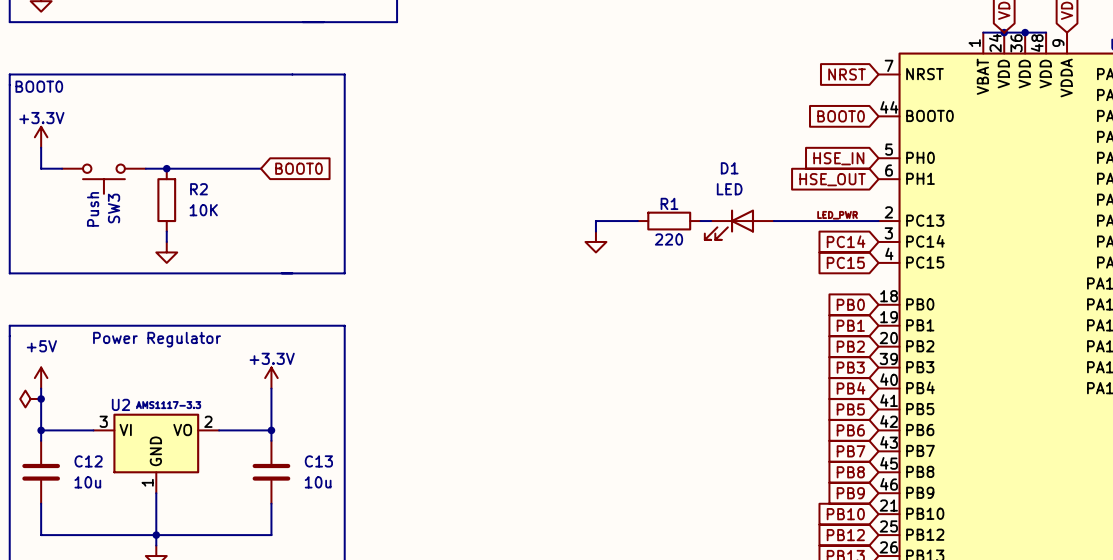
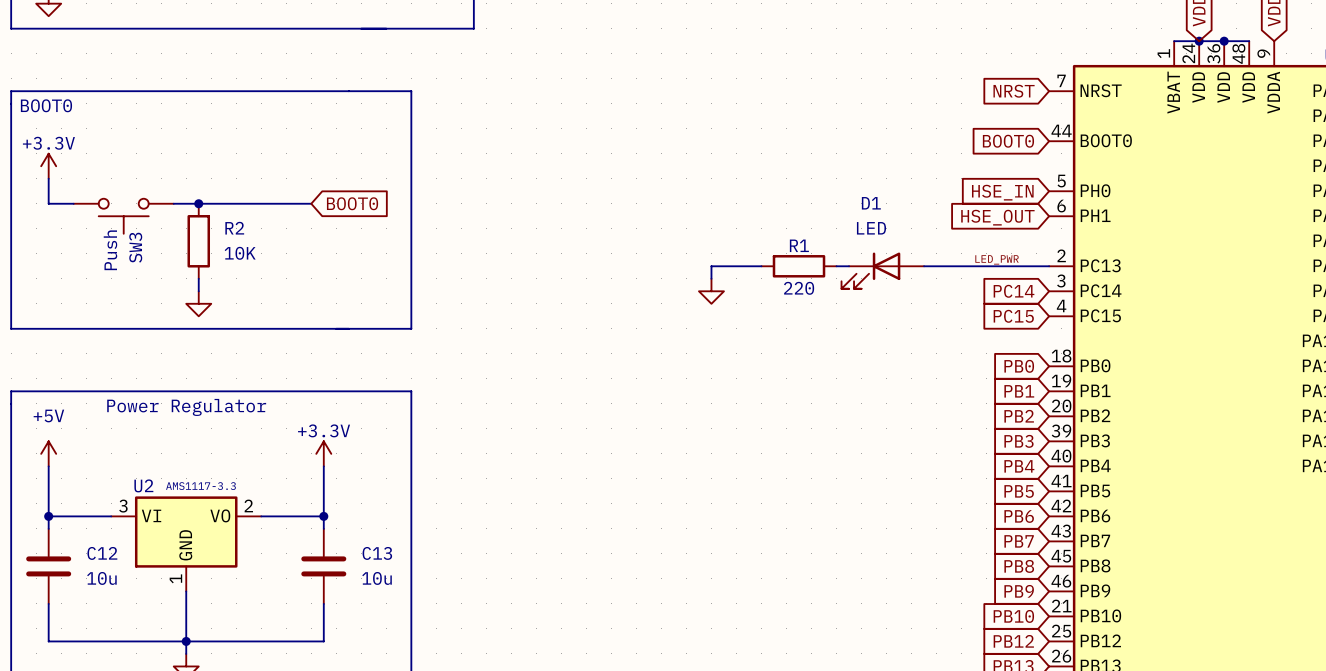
power symbol: (30, 399) -> none
junction: (41, 399) -> none

